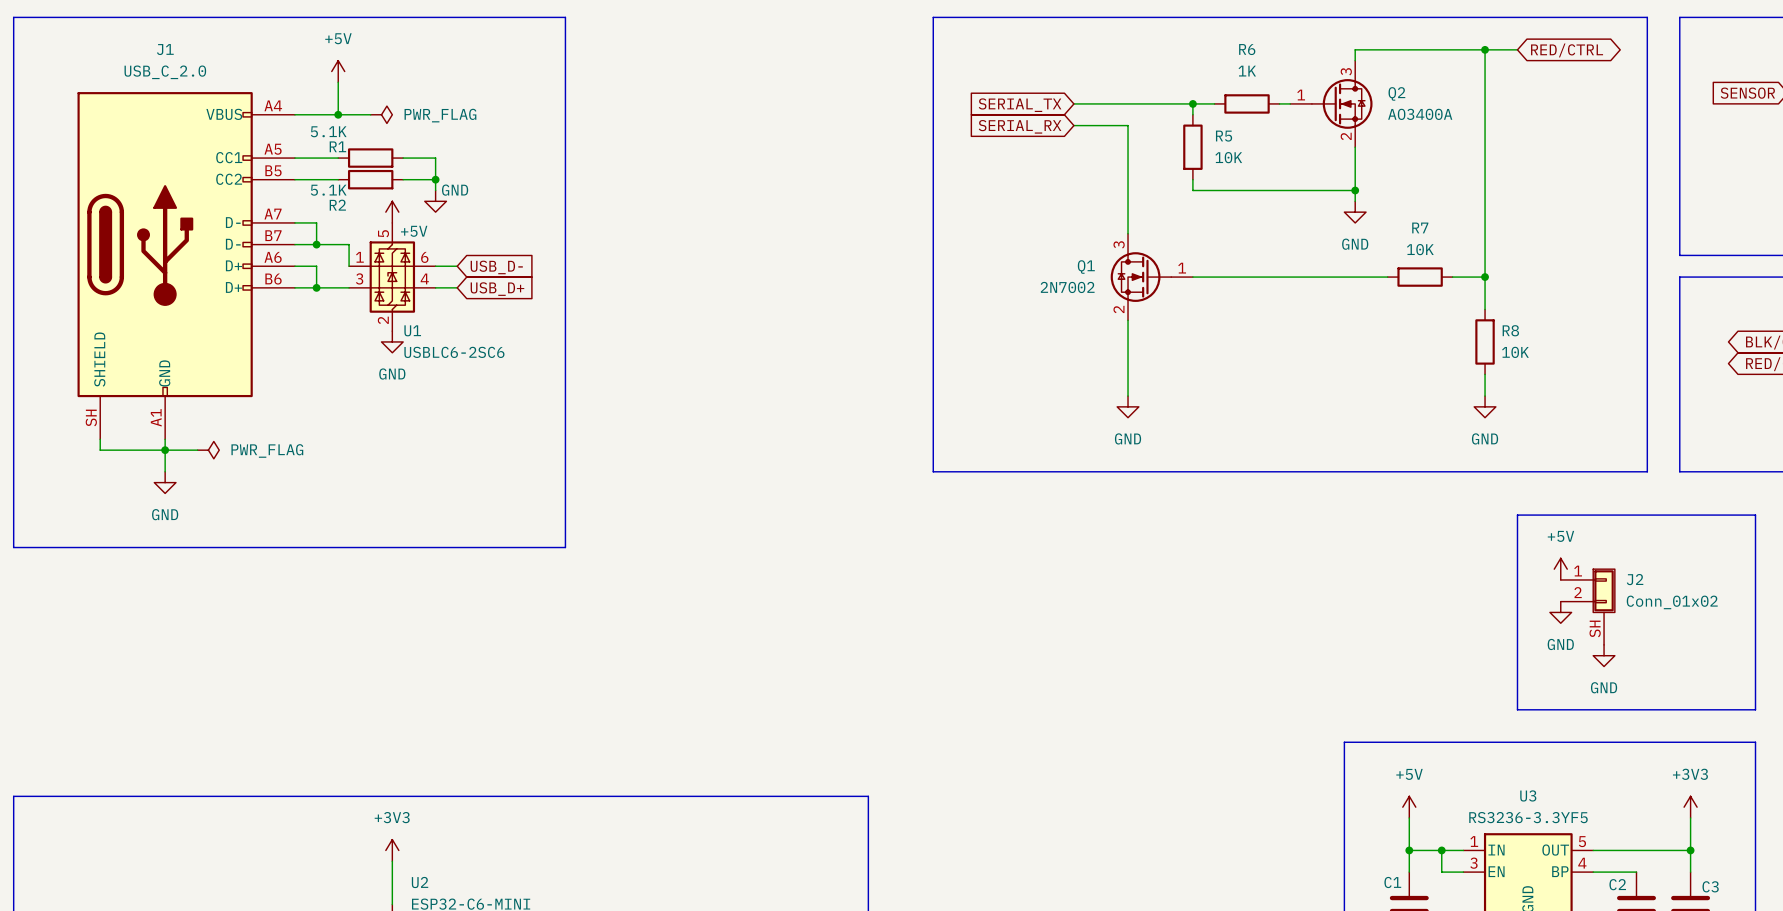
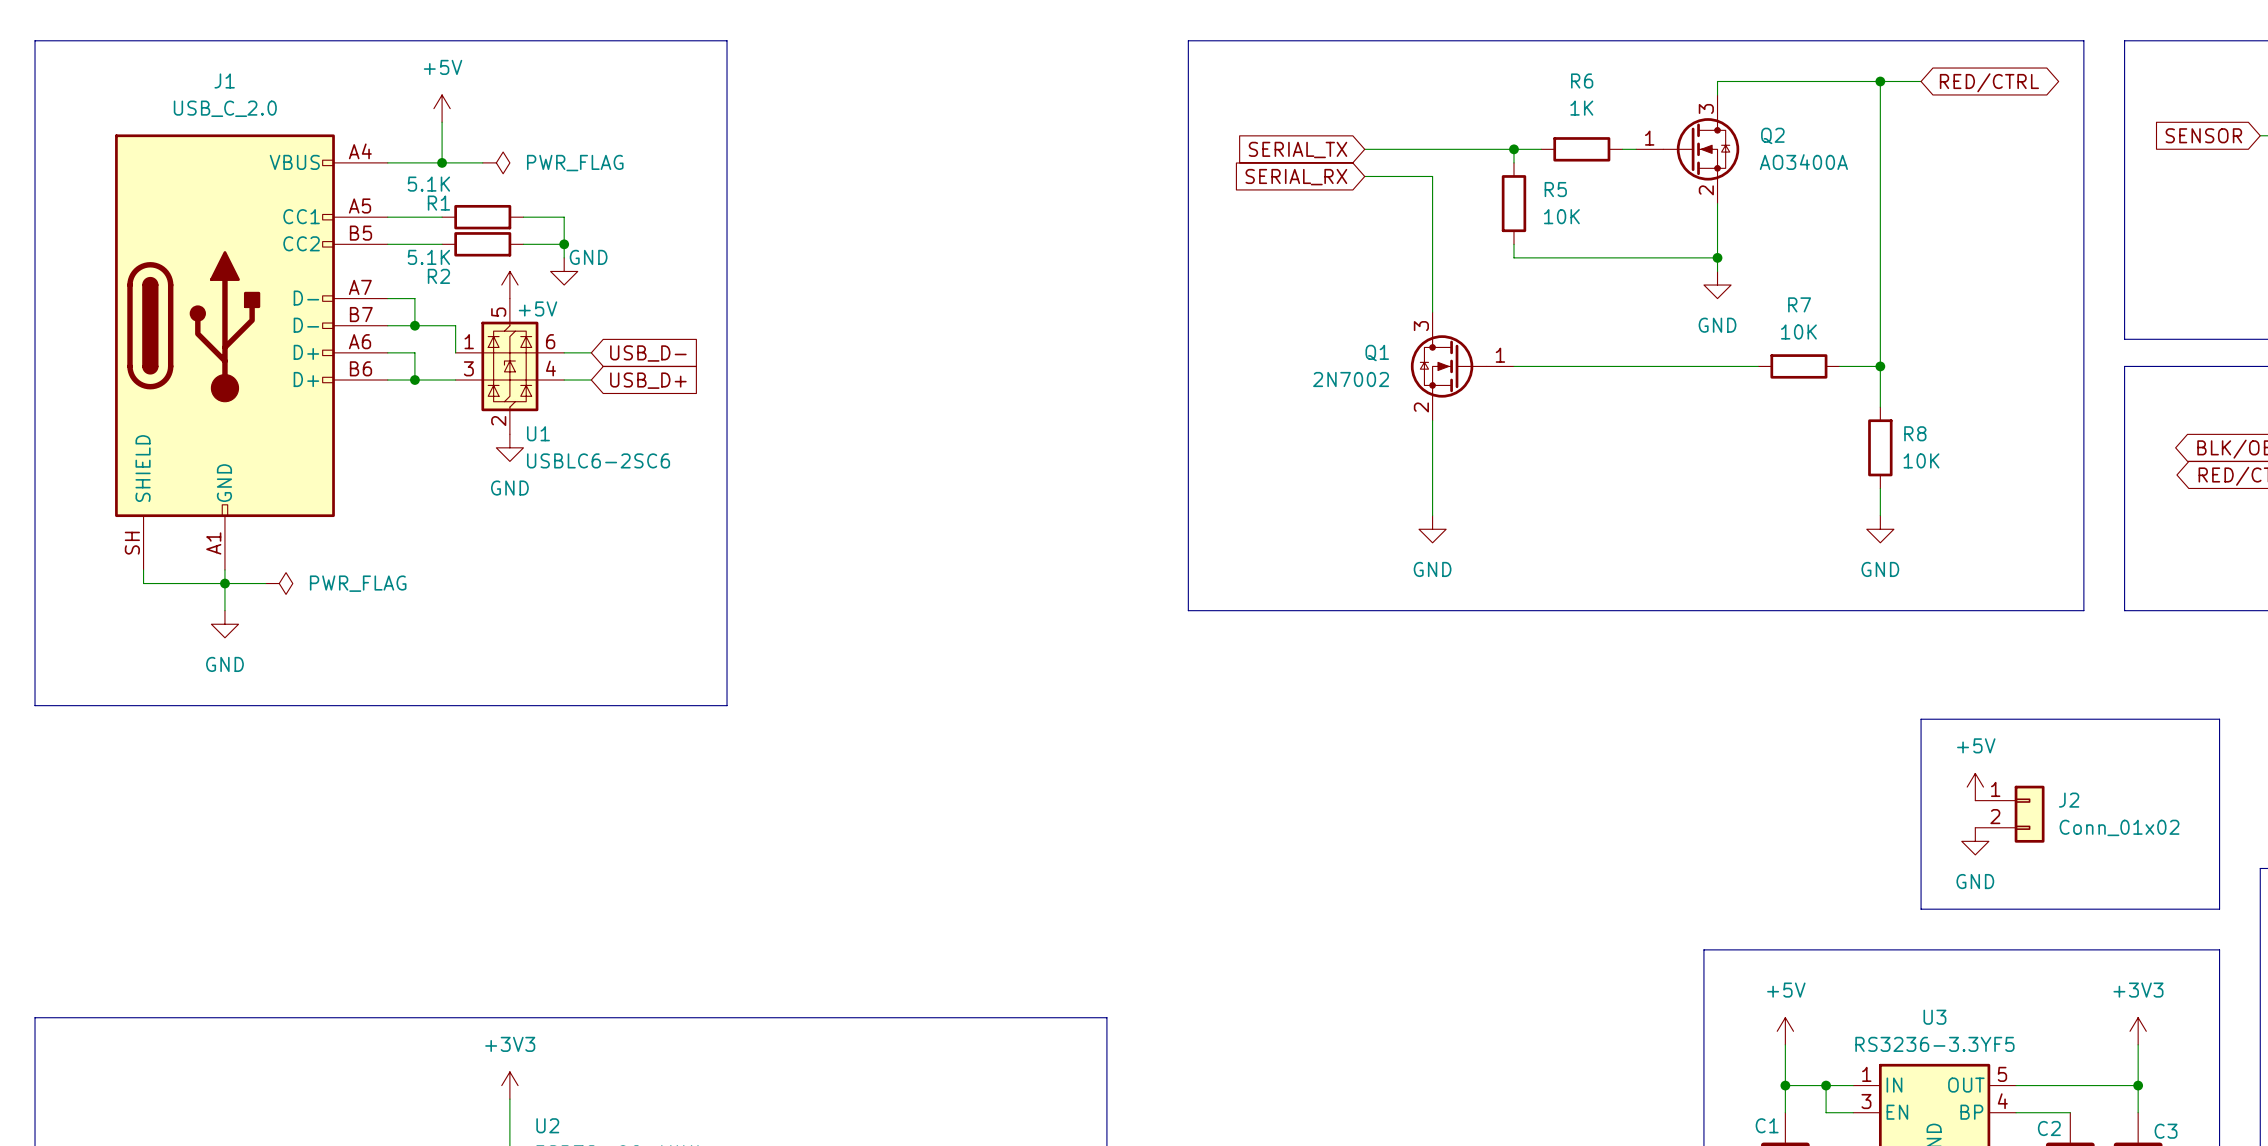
line: (1517, 558) (1517, 515) (1755, 515) (1755, 558) -> (1921, 719) (2219, 719)
J2 symbol: [1560, 568, 1616, 645] -> [1975, 785, 2045, 843]
power symbol: +5V (1560, 569) -> none
power symbol: GND (1560, 612) -> +5V (1975, 787)
power symbol position: GND (1604, 655) -> GND (1975, 841)

